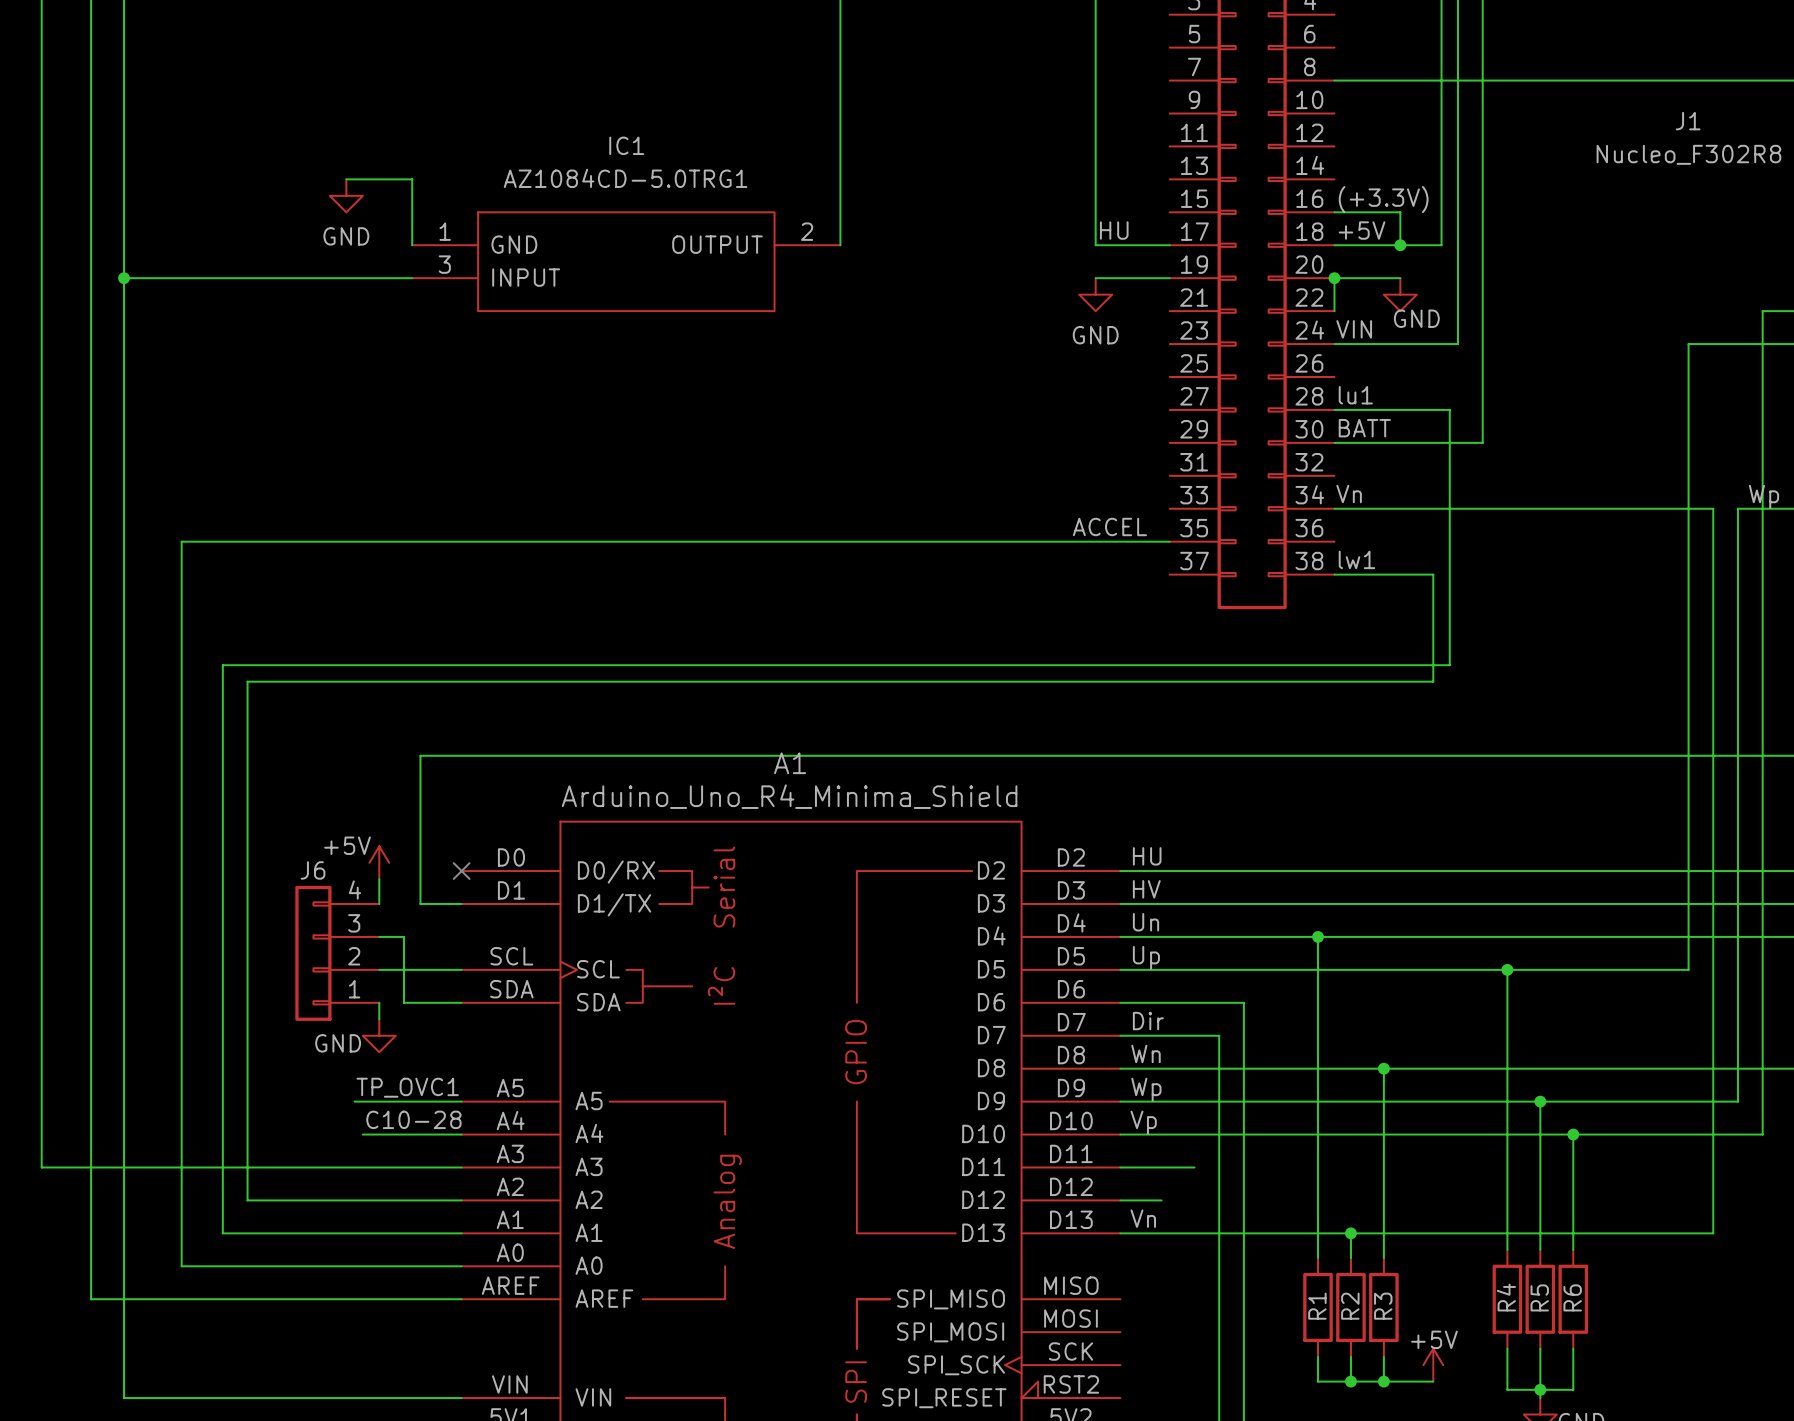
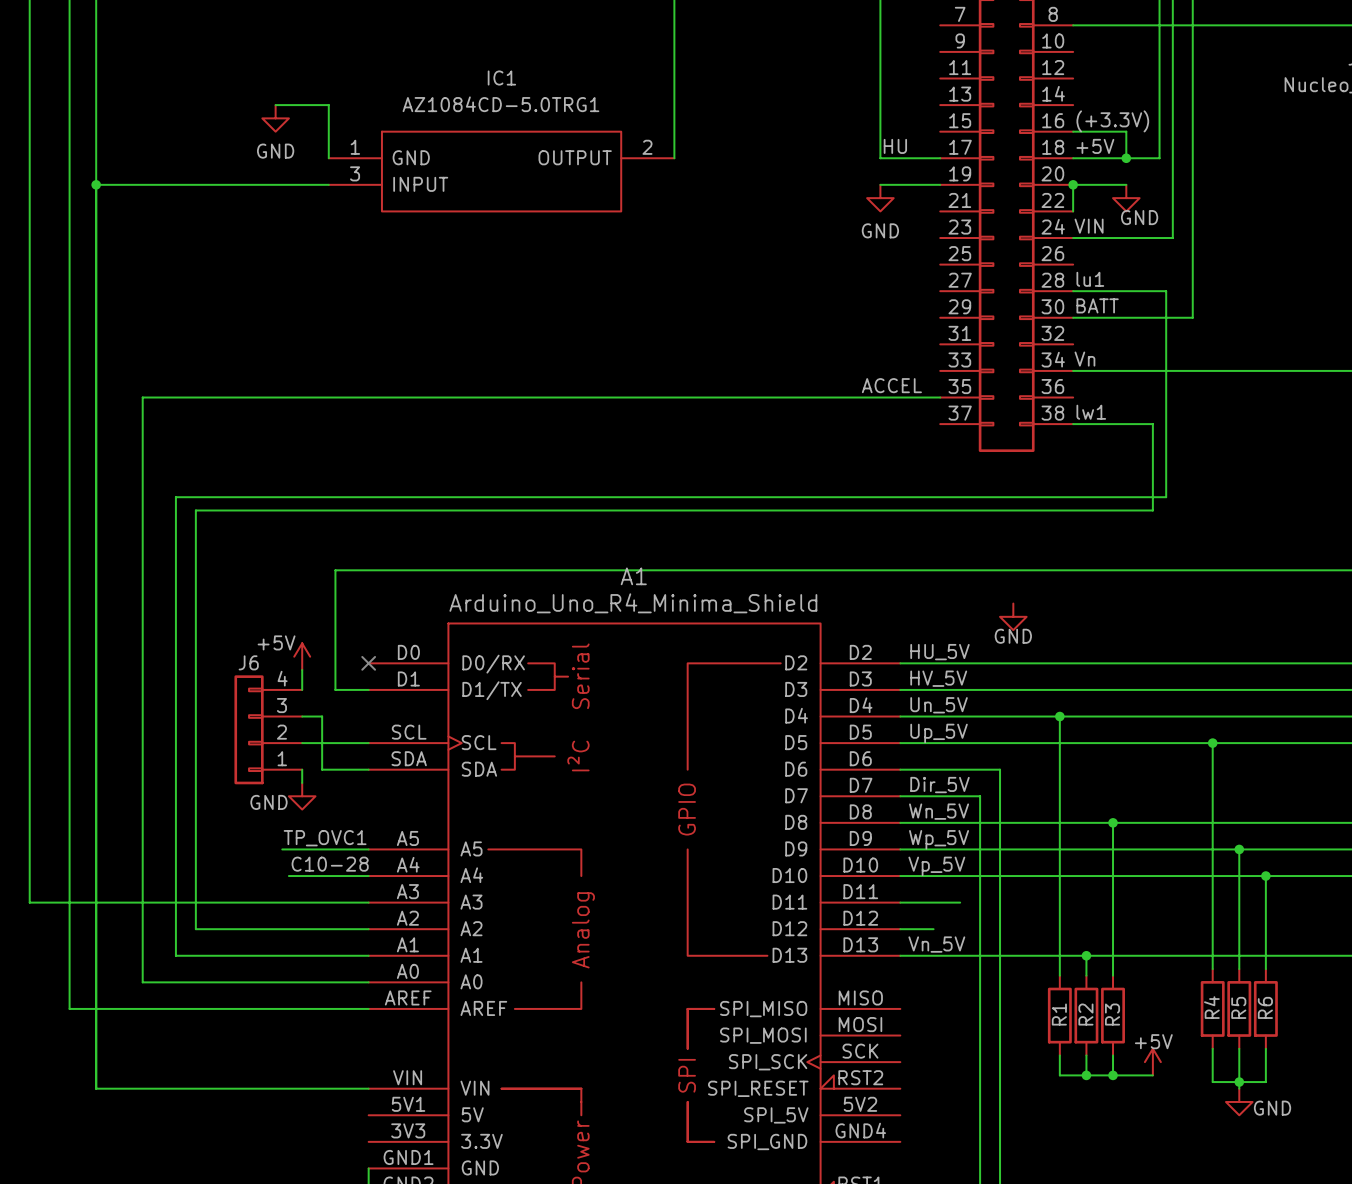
power symbol: none -> GND (1013, 616)
label: HU (1147, 856) -> HU_5V (940, 652)
label: HV (1146, 889) -> HV_5V (938, 678)
label: Un (1146, 922) -> Un_5V (939, 705)
label: Up (1146, 957) -> Up_5V (939, 733)
label: Dir (1148, 1021) -> Dir_5V (940, 785)
label: Wn (1146, 1053) -> Wn_5V (939, 811)
label: Wp (1146, 1089) -> Wp_5V (939, 839)
label: Vp (1143, 1122) -> Vp_5V (936, 866)
label: Vn (1143, 1218) -> Vn_5V (936, 944)

